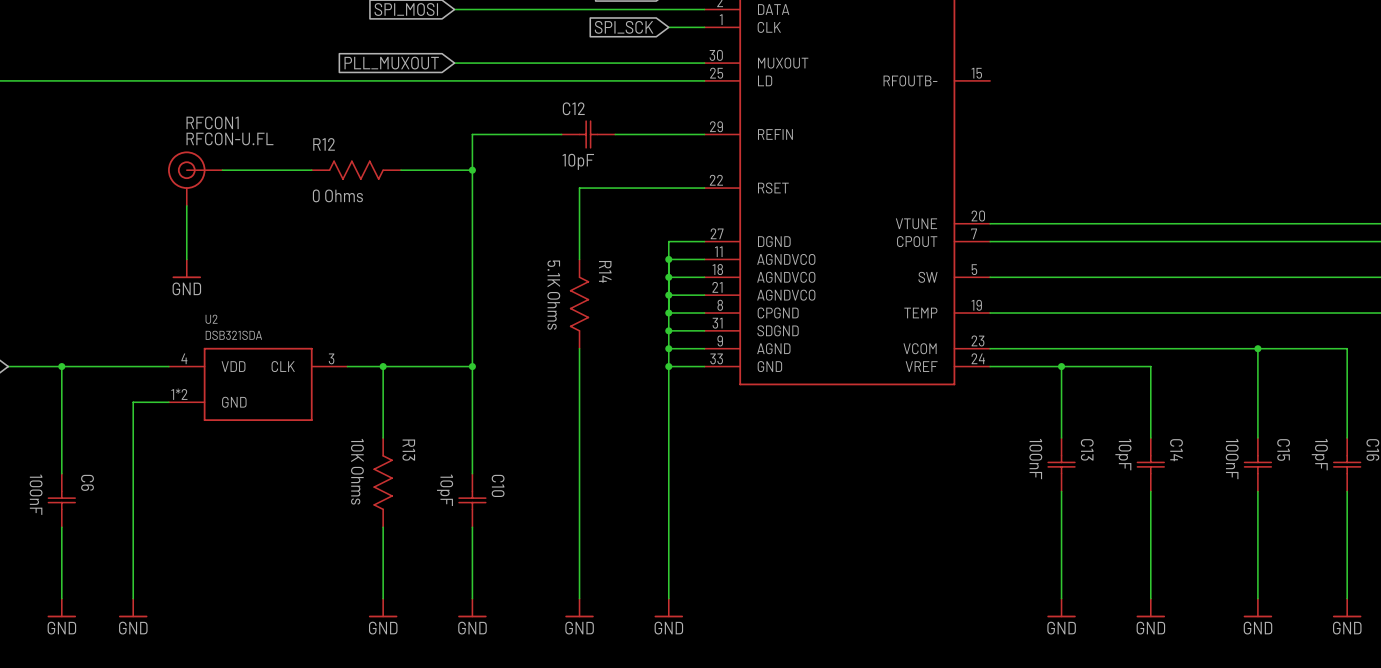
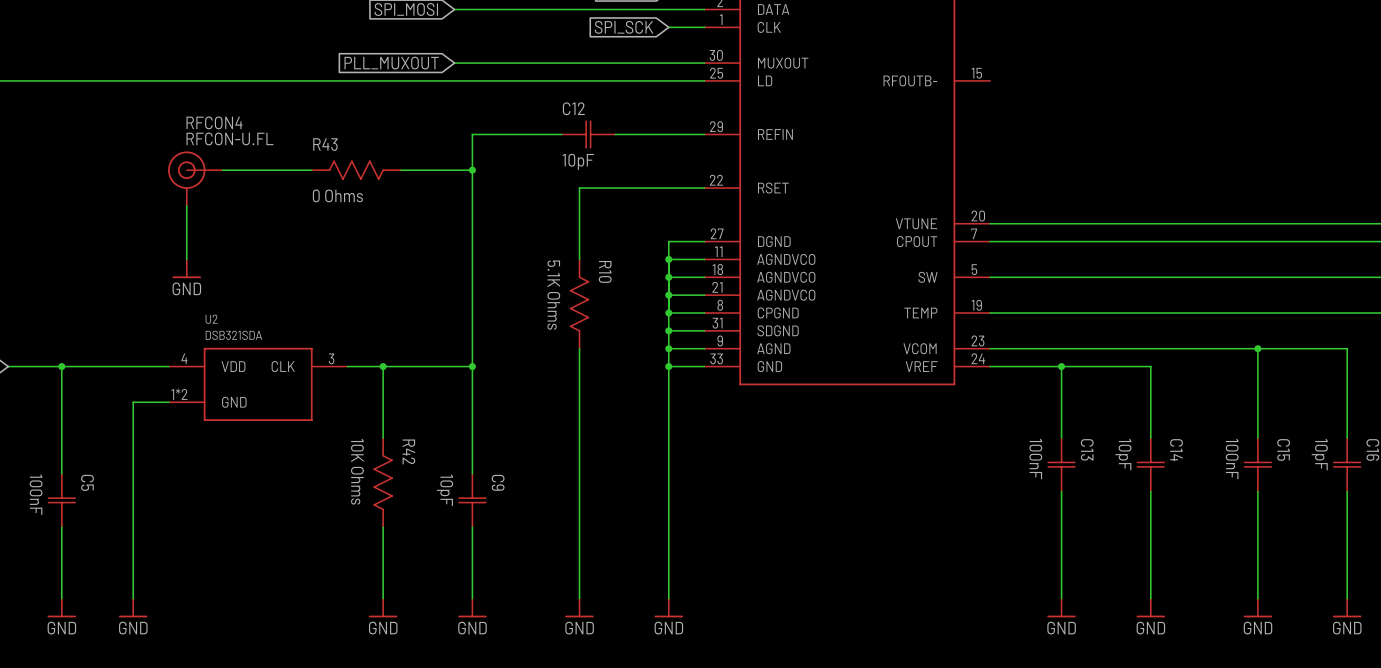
RFCON1 name: RFCON1 (212, 122) -> RFCON4 (214, 122)
R12 name: R12 (324, 144) -> R43 (325, 144)
R14 name: R14 (605, 271) -> R10 (605, 271)
R13 name: R13 (408, 450) -> R42 (408, 451)
C6 name: C6 (87, 482) -> C5 (87, 482)
C10 name: C10 (498, 485) -> C9 (498, 482)

